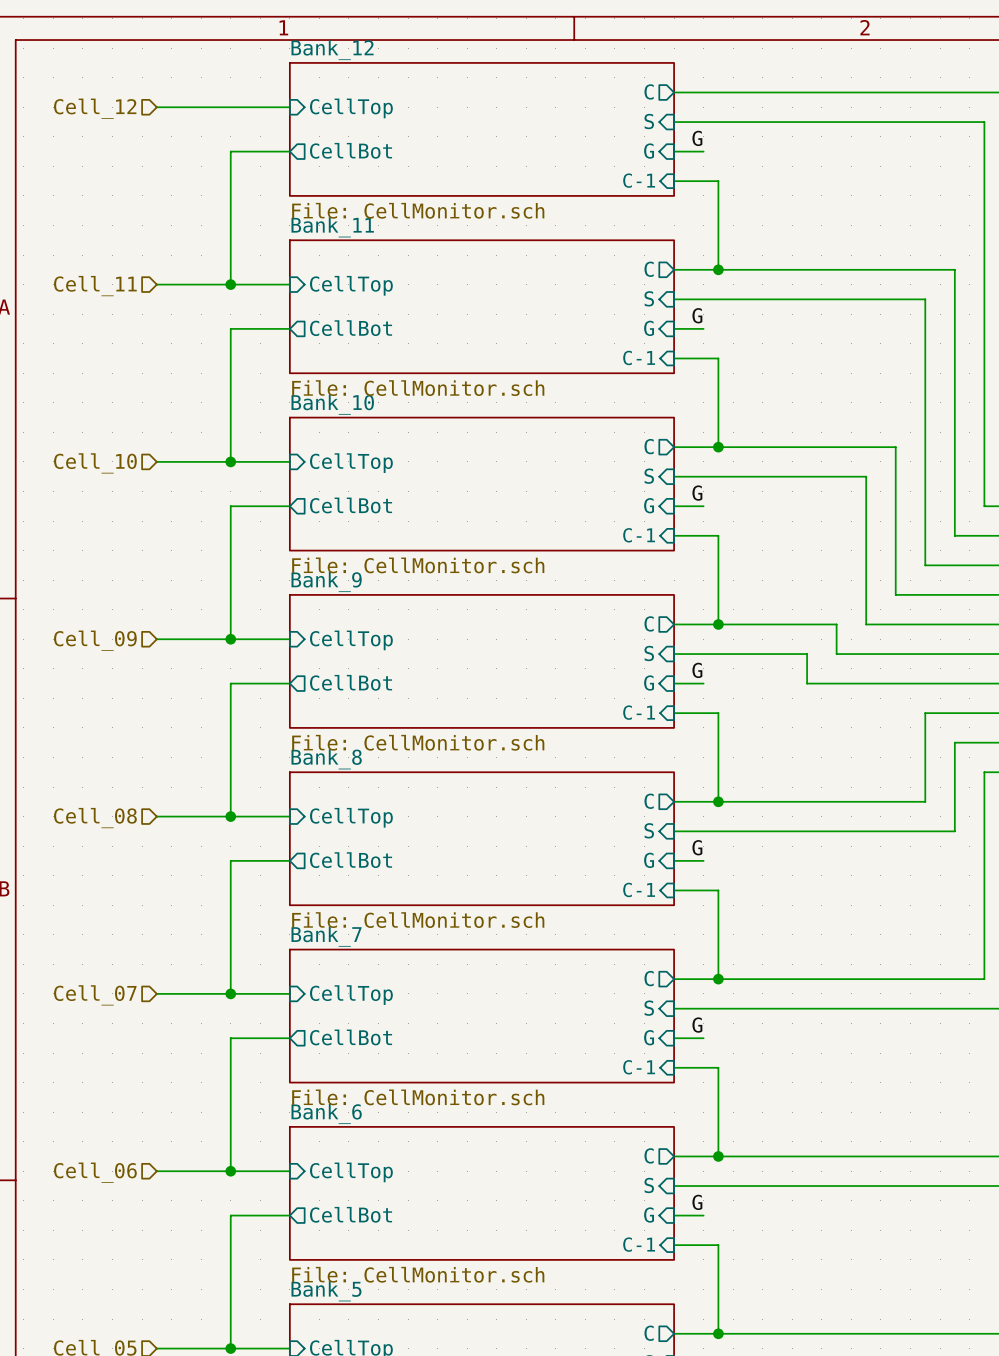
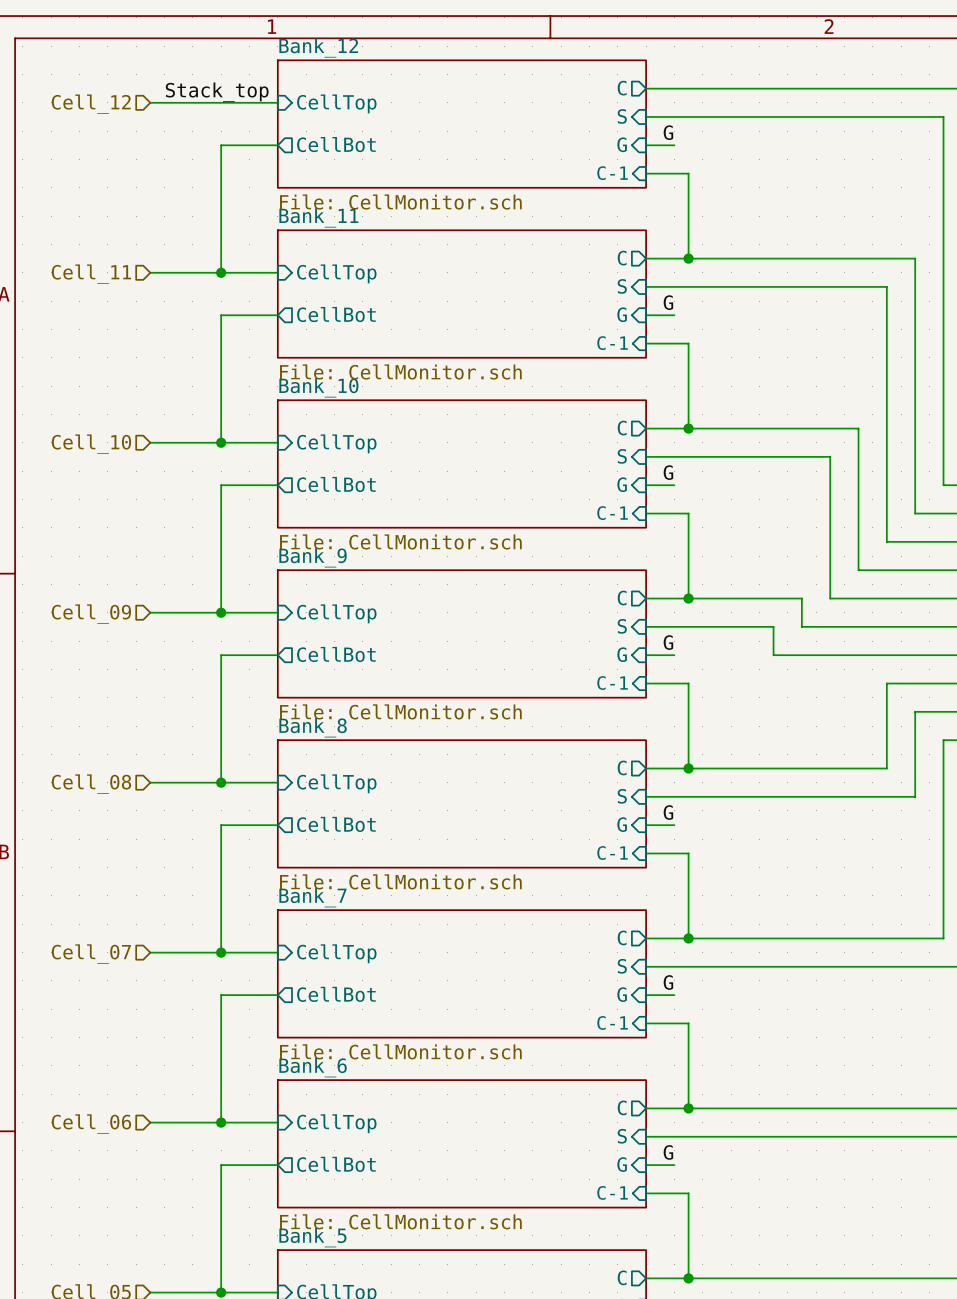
label: none -> Stack_top (217, 92)

